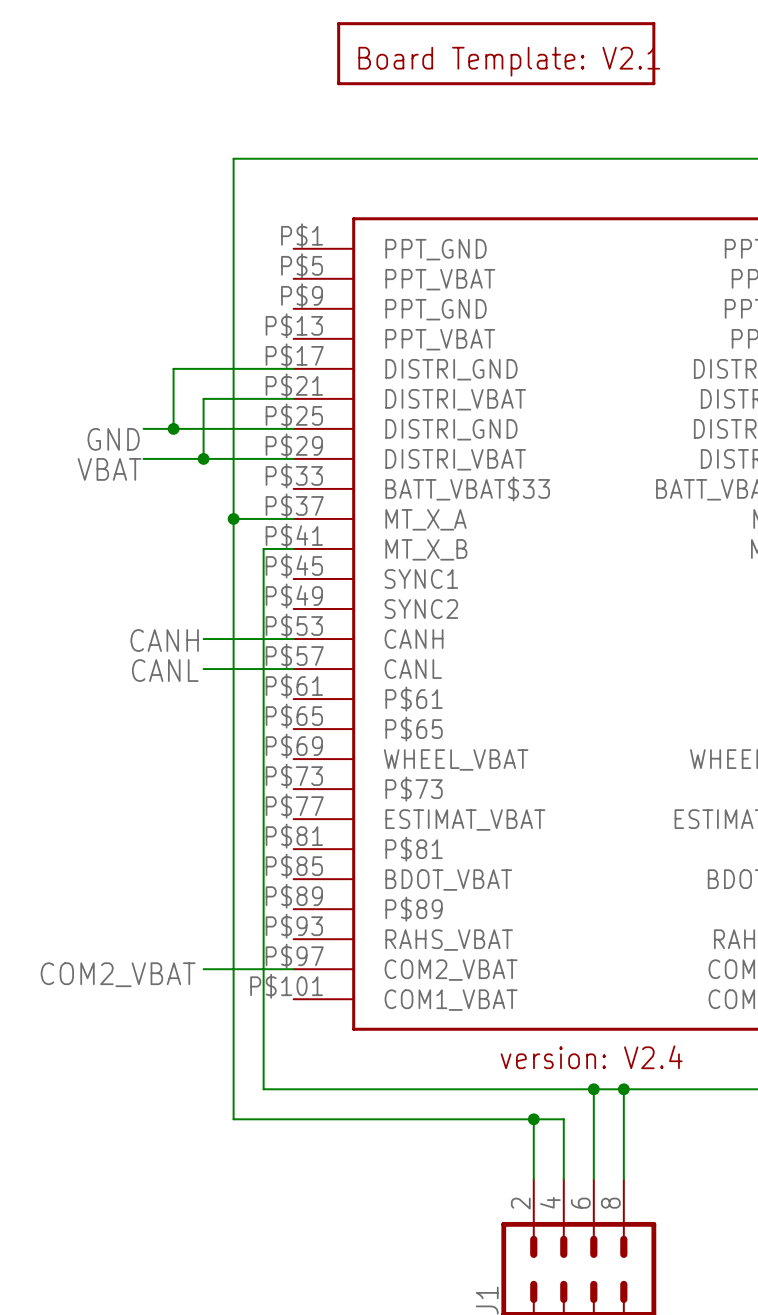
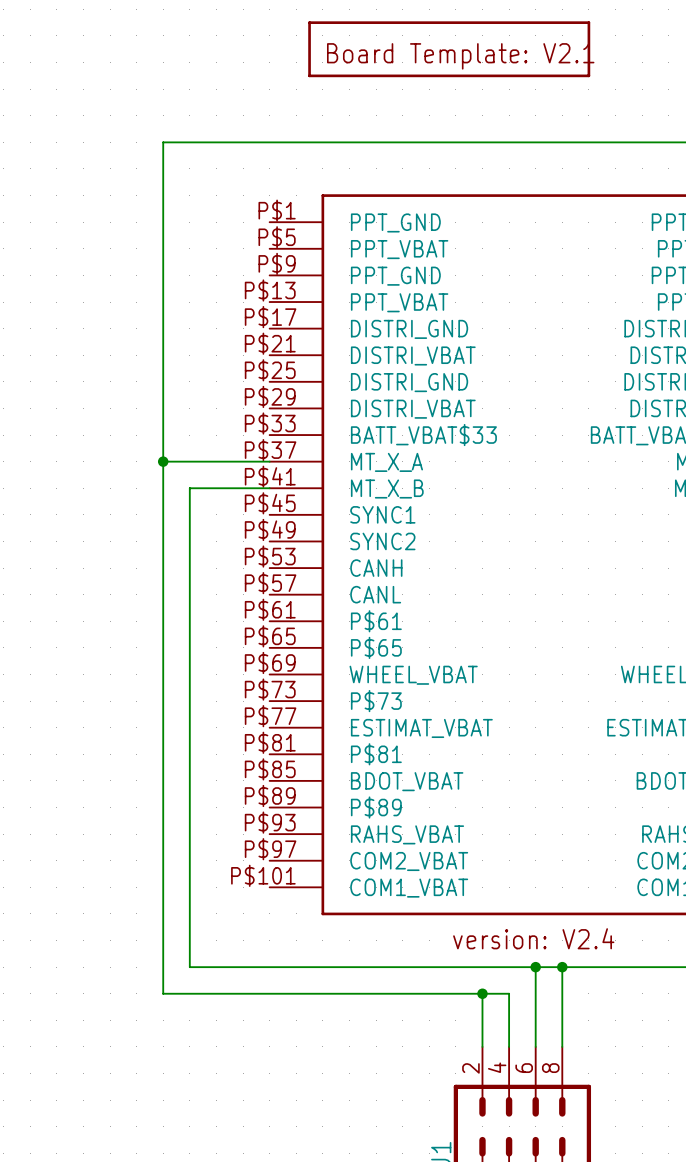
wire: (233, 158) (233, 1119) -> (163, 381) (163, 993) (216, 993)
wire: (173, 368) (293, 368) -> (163, 328) (163, 142) (216, 142)
wire: (293, 398) (203, 398) (203, 458) -> none
wire: (143, 428) (293, 428) -> none
junction: (173, 428) -> none
label: GND (113, 439) -> none
wire: (143, 458) (293, 458) -> none
junction: (203, 458) -> none
label: VBAT (109, 469) -> none
wire: none -> (163, 461) (216, 461)
junction: none -> (163, 461)
junction: (233, 518) -> none
wire: (263, 548) (263, 1089) -> (243, 488) (189, 488) (189, 967) (243, 967)
wire: (203, 639) (293, 639) -> none
label: CANH (164, 640) -> none
wire: (203, 669) (293, 669) -> none
label: CANL (165, 670) -> none
wire: (203, 969) (293, 969) -> none
label: COM2_VBAT (118, 974) -> none

